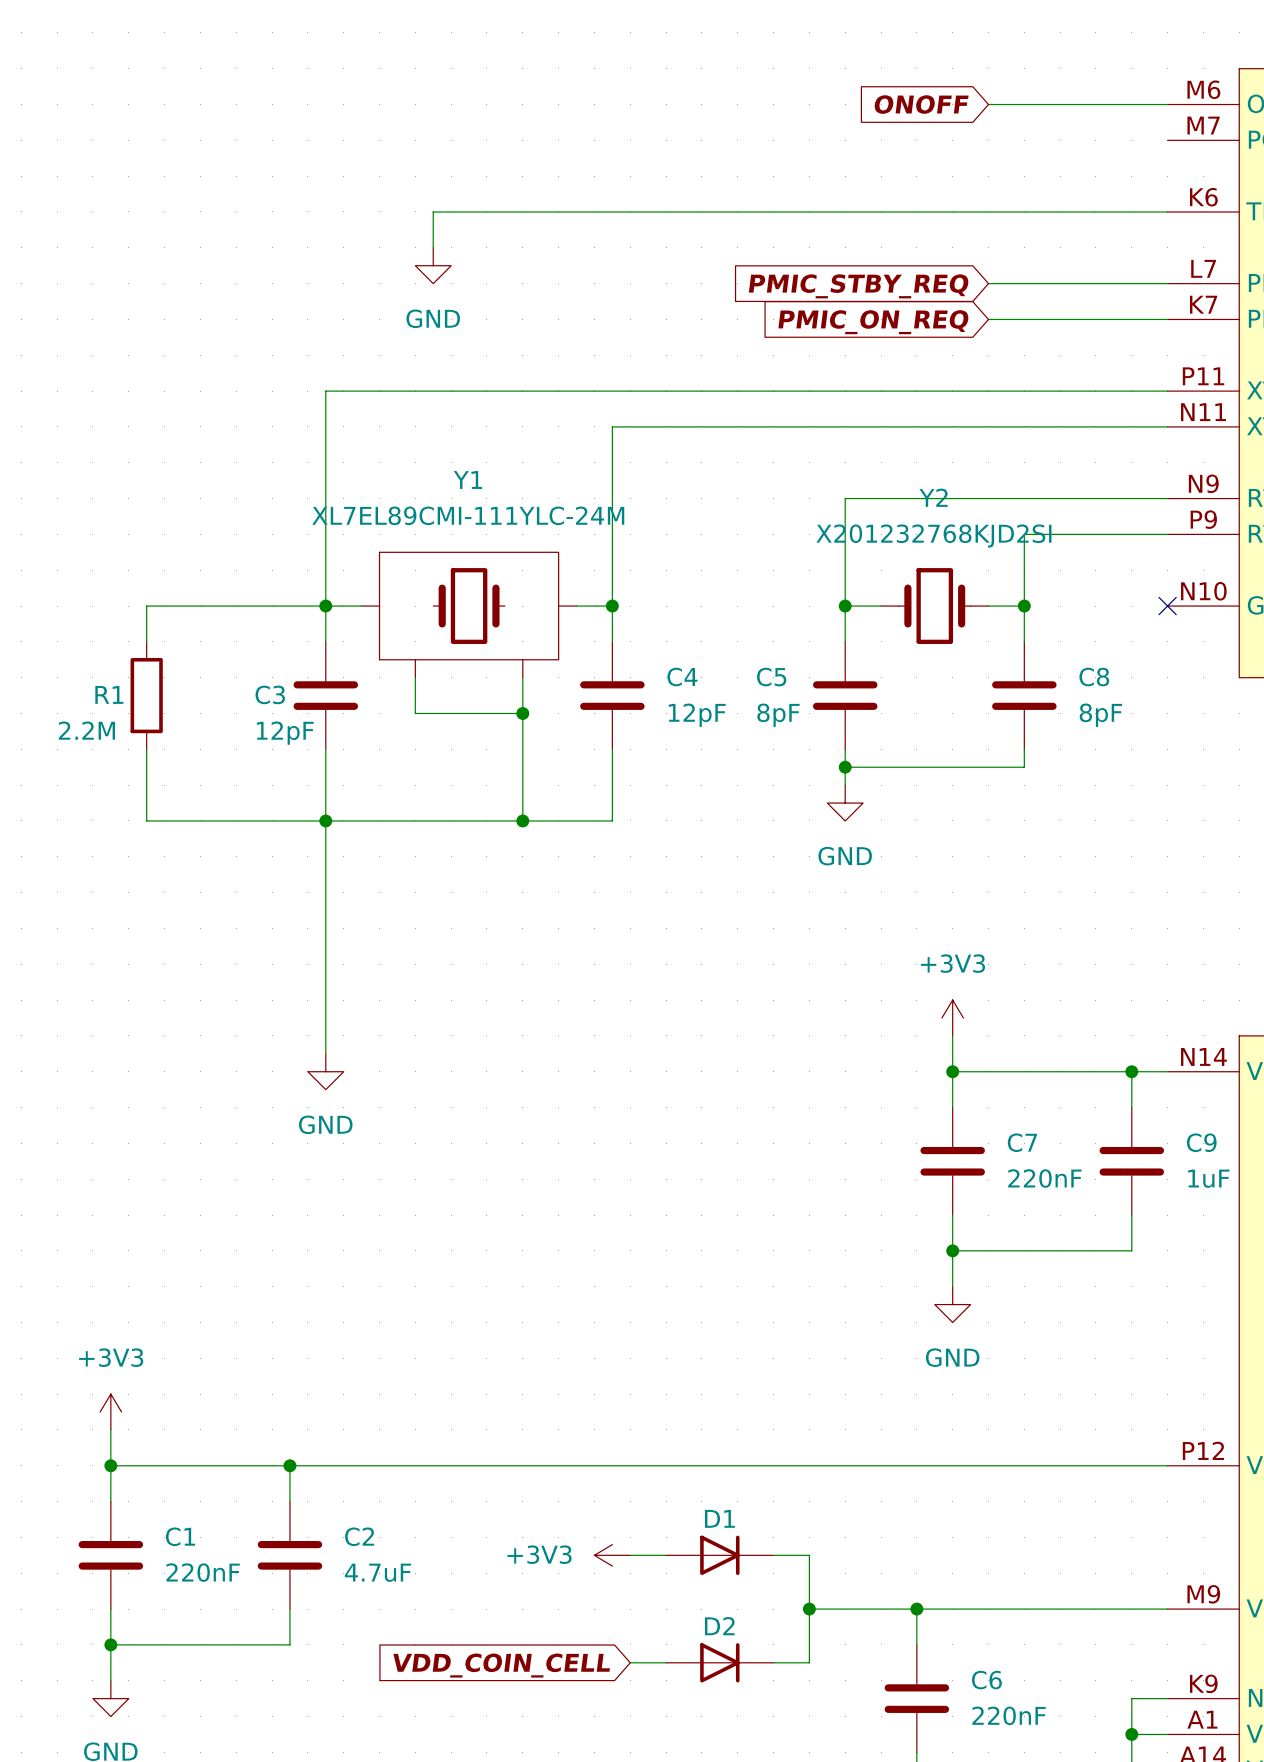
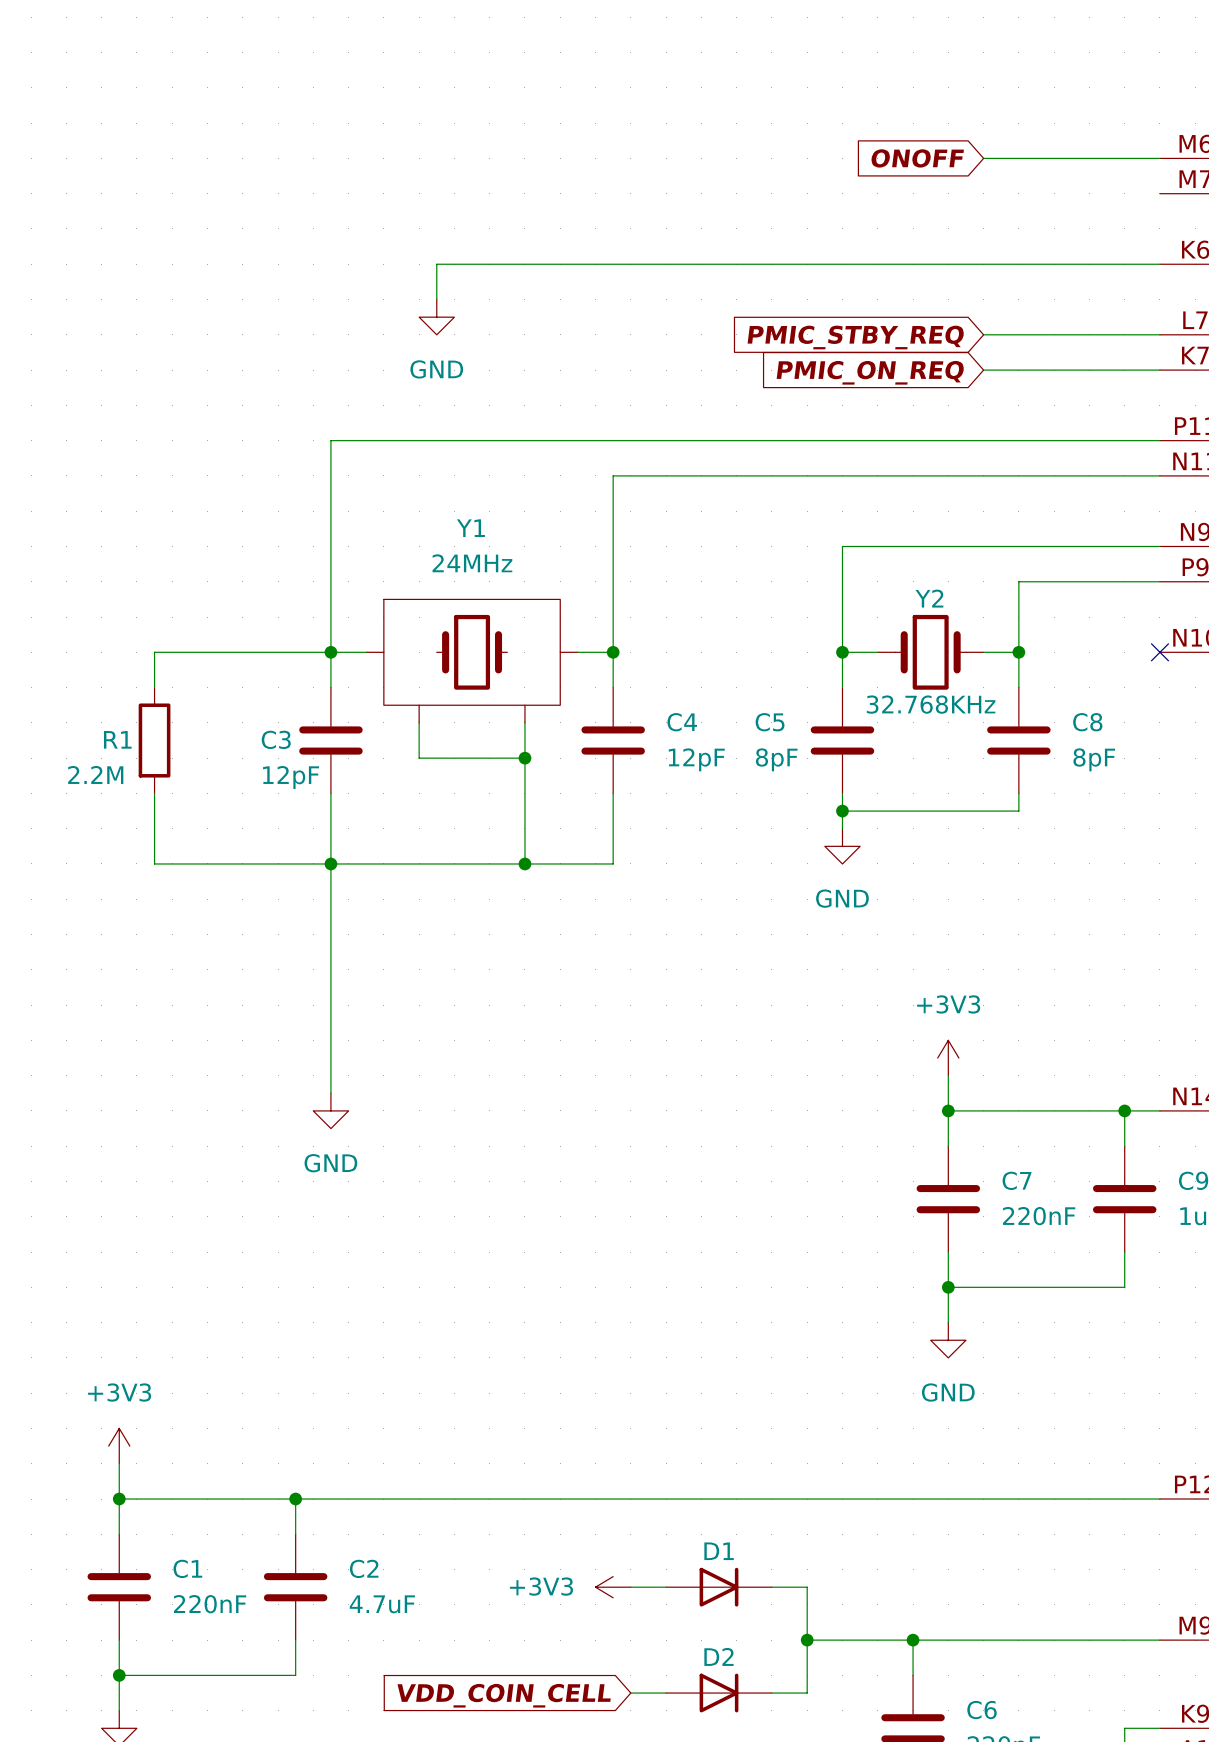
Y2 name position: Y2 (933, 497) -> Y2 (929, 598)
Y1 value: XL7EL89CMI-111YLC-24M (468, 515) -> 24MHz (472, 563)
Y2 value: X201232768KJD2SI (933, 536) -> 32.768KHz (931, 704)

